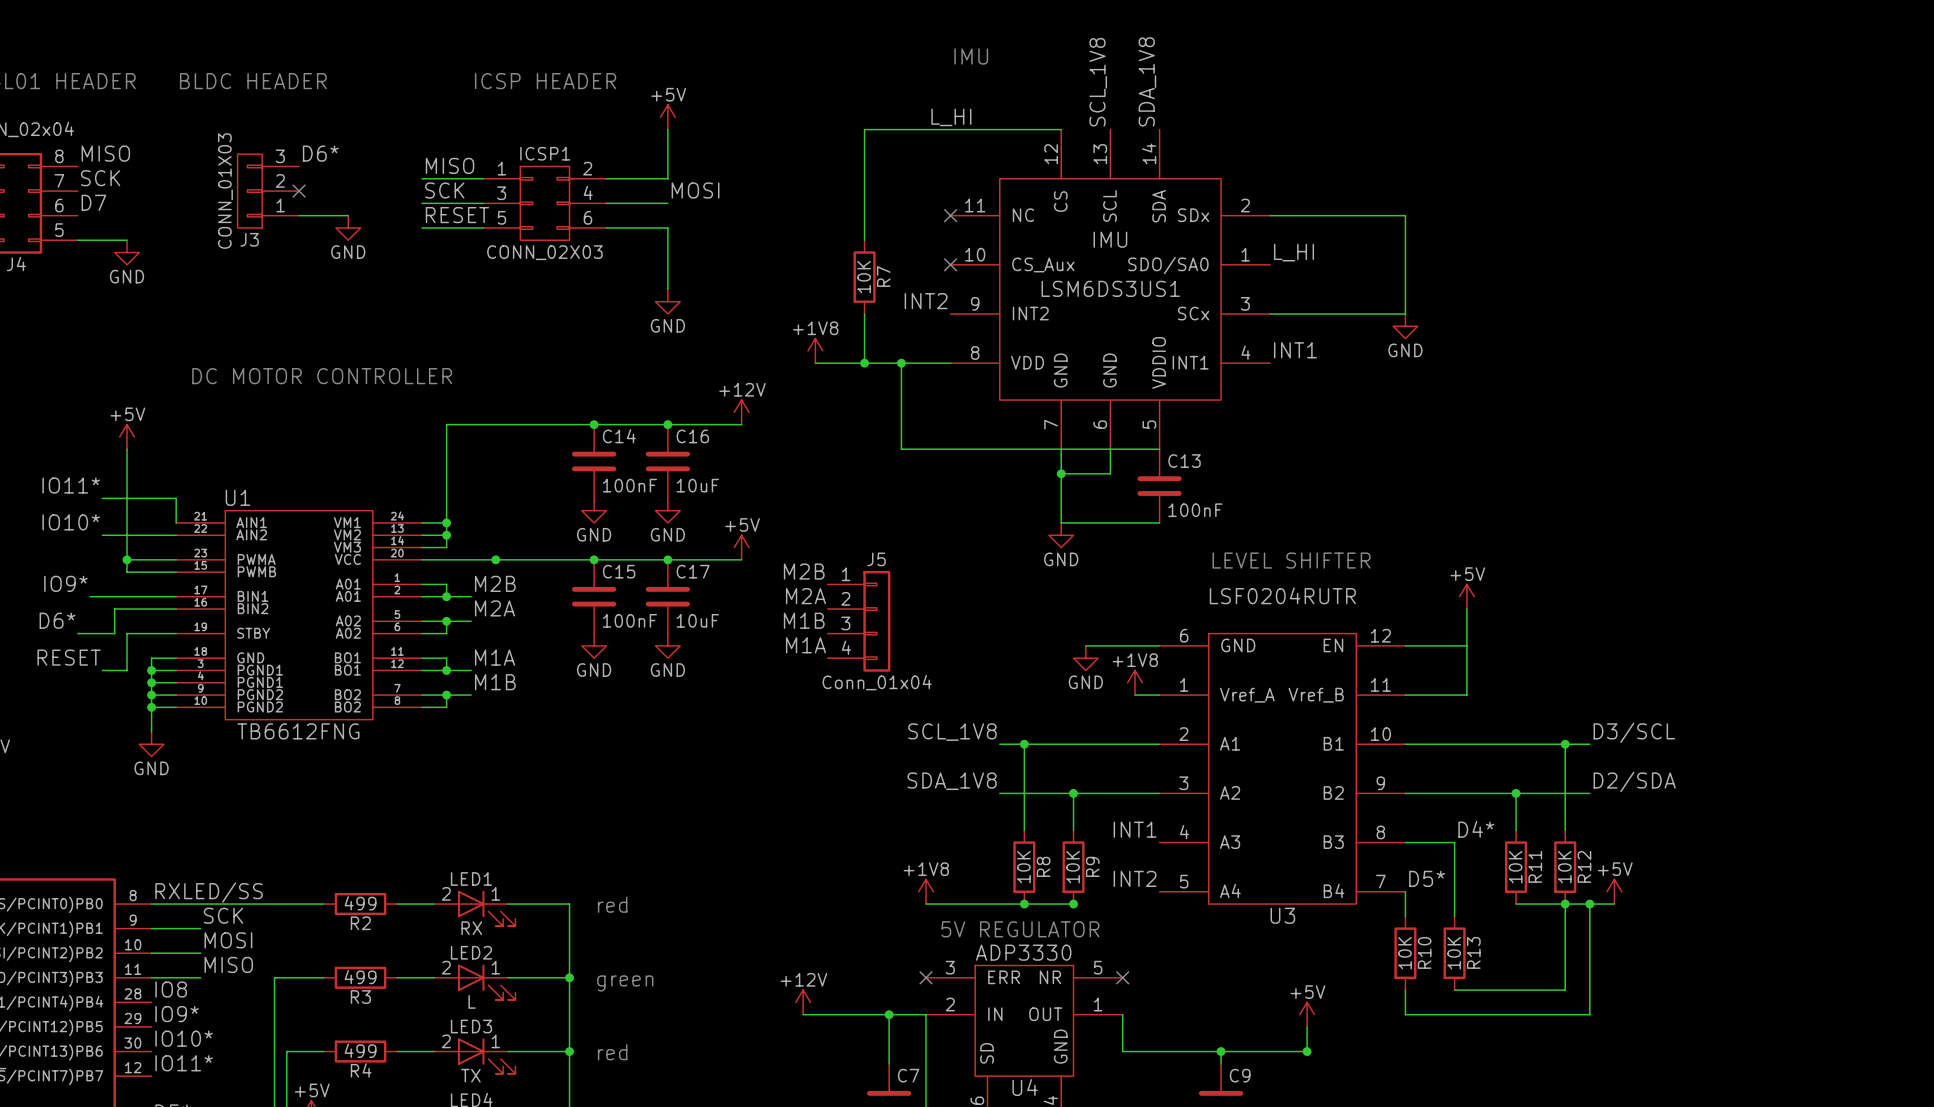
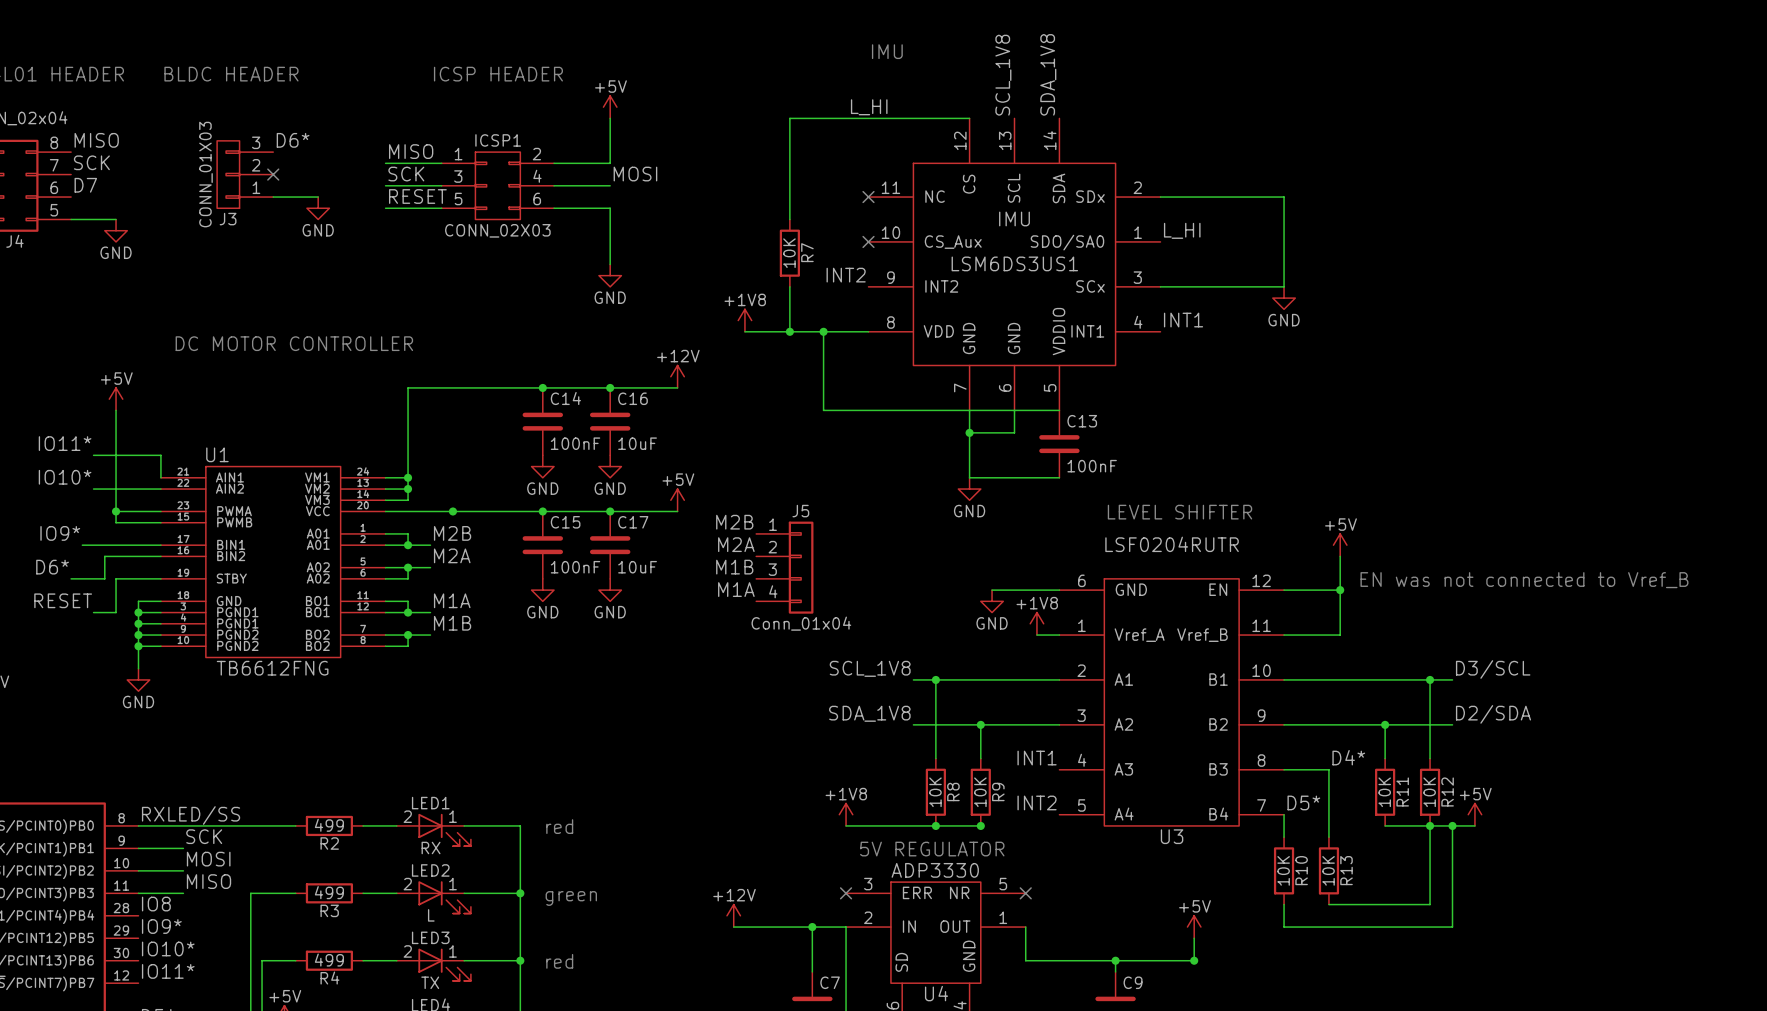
text: none -> EN was not connected to Vref_B (1524, 580)
junction: none -> (1340, 590)

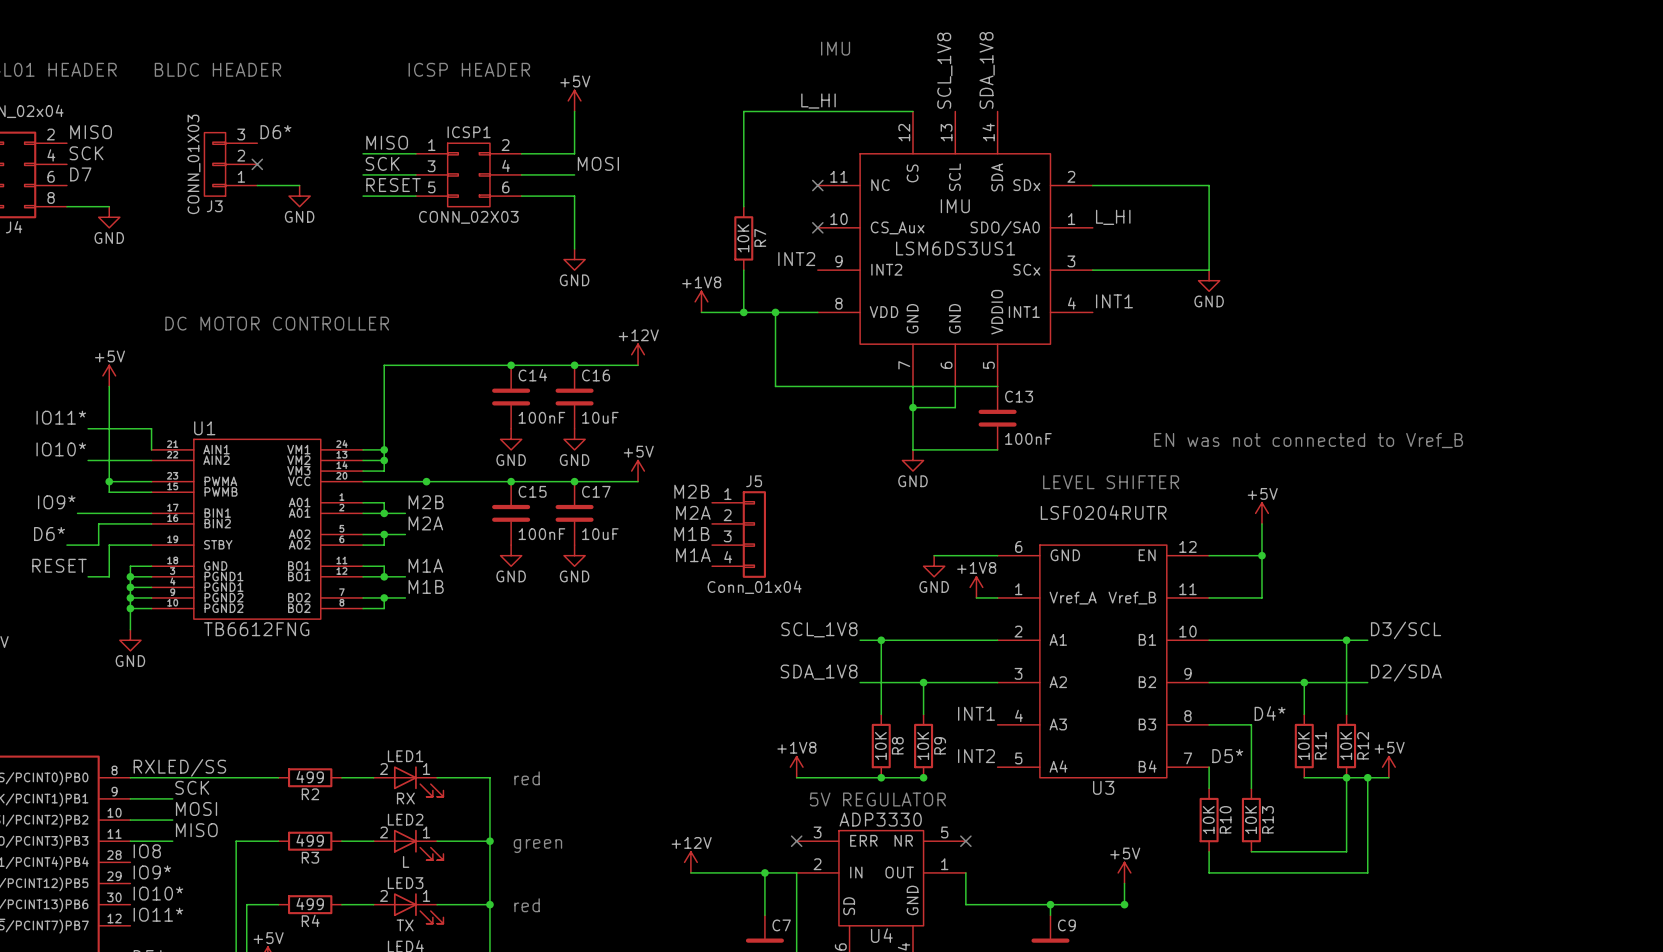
J4 pin number: 8 (54, 142) -> 2 (50, 134)
J4 pin number: 7 (54, 165) -> 4 (51, 155)
J4 pin number: 5 (54, 210) -> 8 (51, 197)
text position: EN was not connected to Vref_B (1524, 580) -> EN was not connected to Vref_B (1308, 440)

